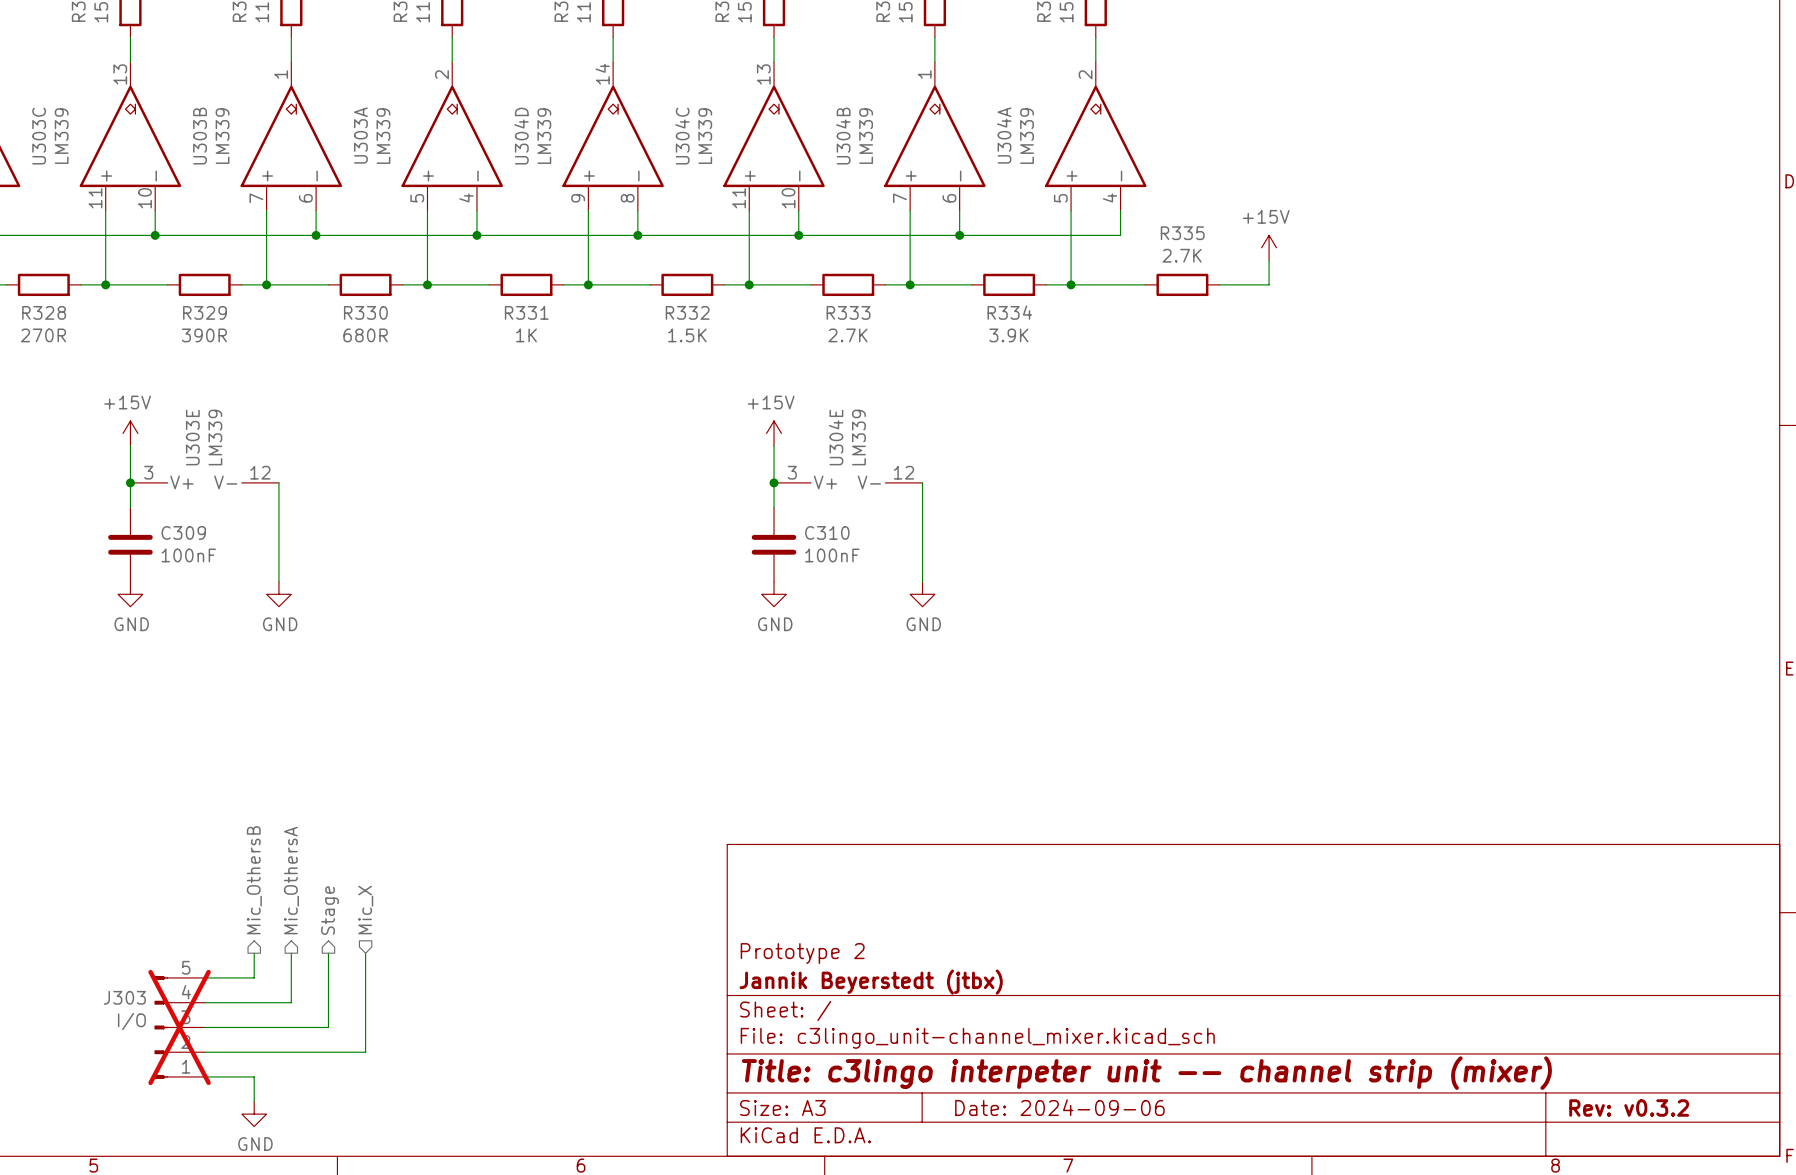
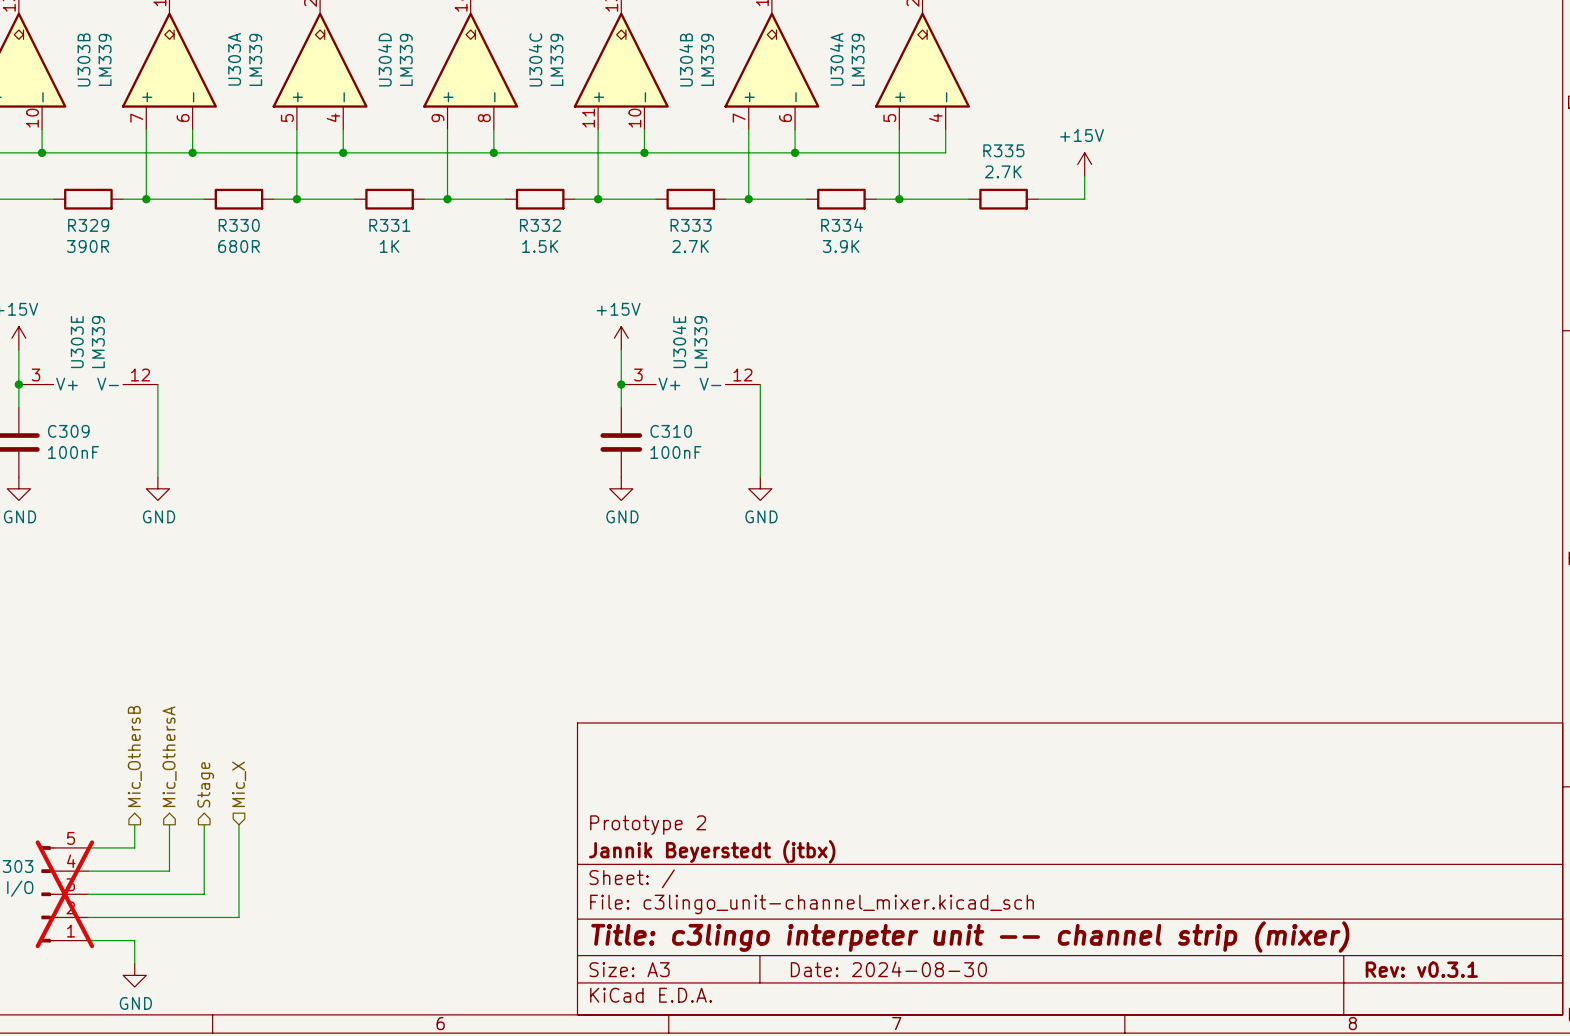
title block: Date: 2024-09-06 (1059, 1107) -> Date: 2024-08-30 (888, 969)
title block: Rev: v0.3.2 (1629, 1108) -> Rev: v0.3.1 (1421, 969)

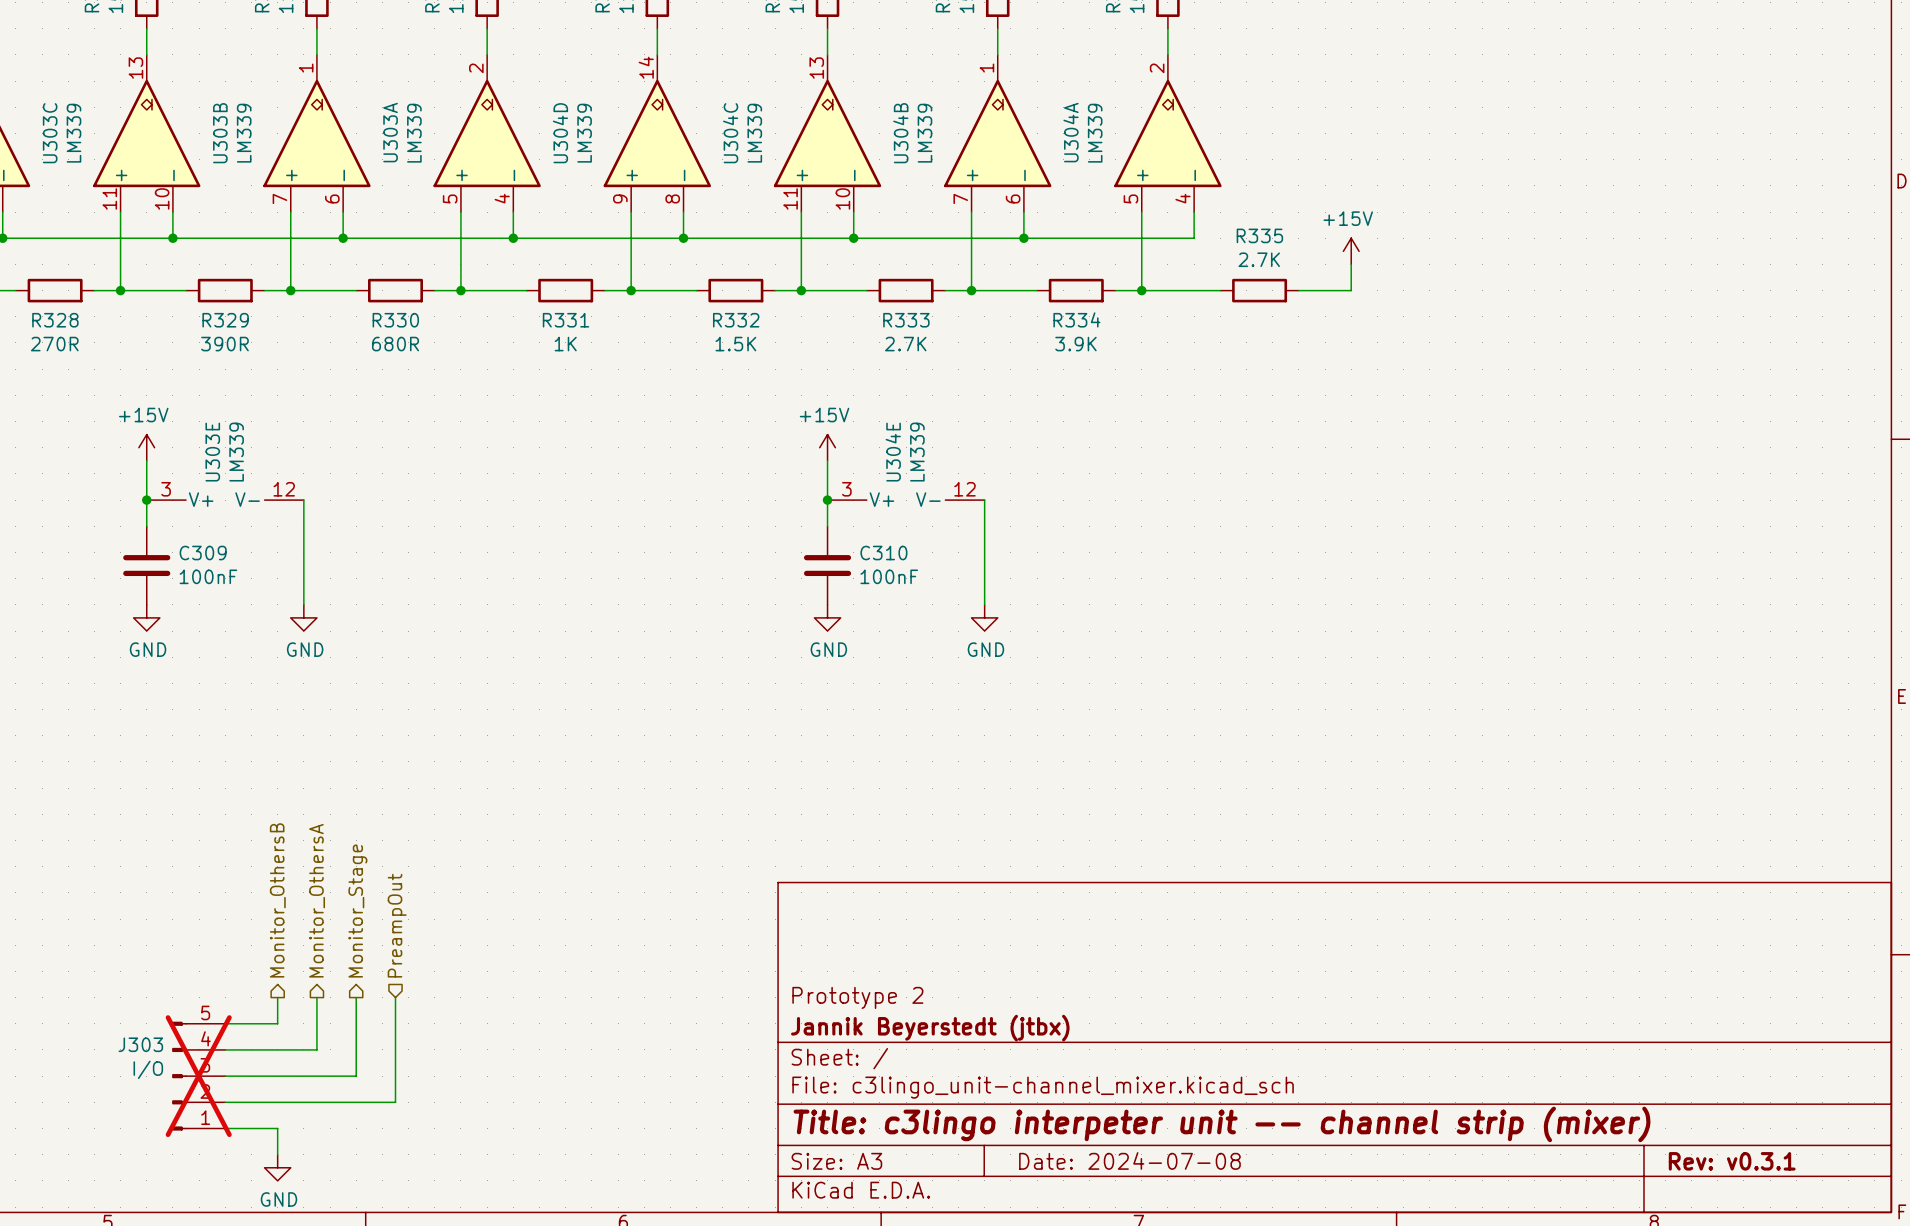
hierarchical label: Mic_OthersB (134, 756) -> Monitor_OthersB (277, 900)
hierarchical label: Mic_OthersA (169, 756) -> Monitor_OthersA (317, 900)
hierarchical label: Stage (205, 784) -> Monitor_Stage (357, 911)
hierarchical label: Mic_X (239, 784) -> PreampOut (397, 925)
title block: Date: 2024-08-30 (888, 969) -> Date: 2024-07-08 (1129, 1160)

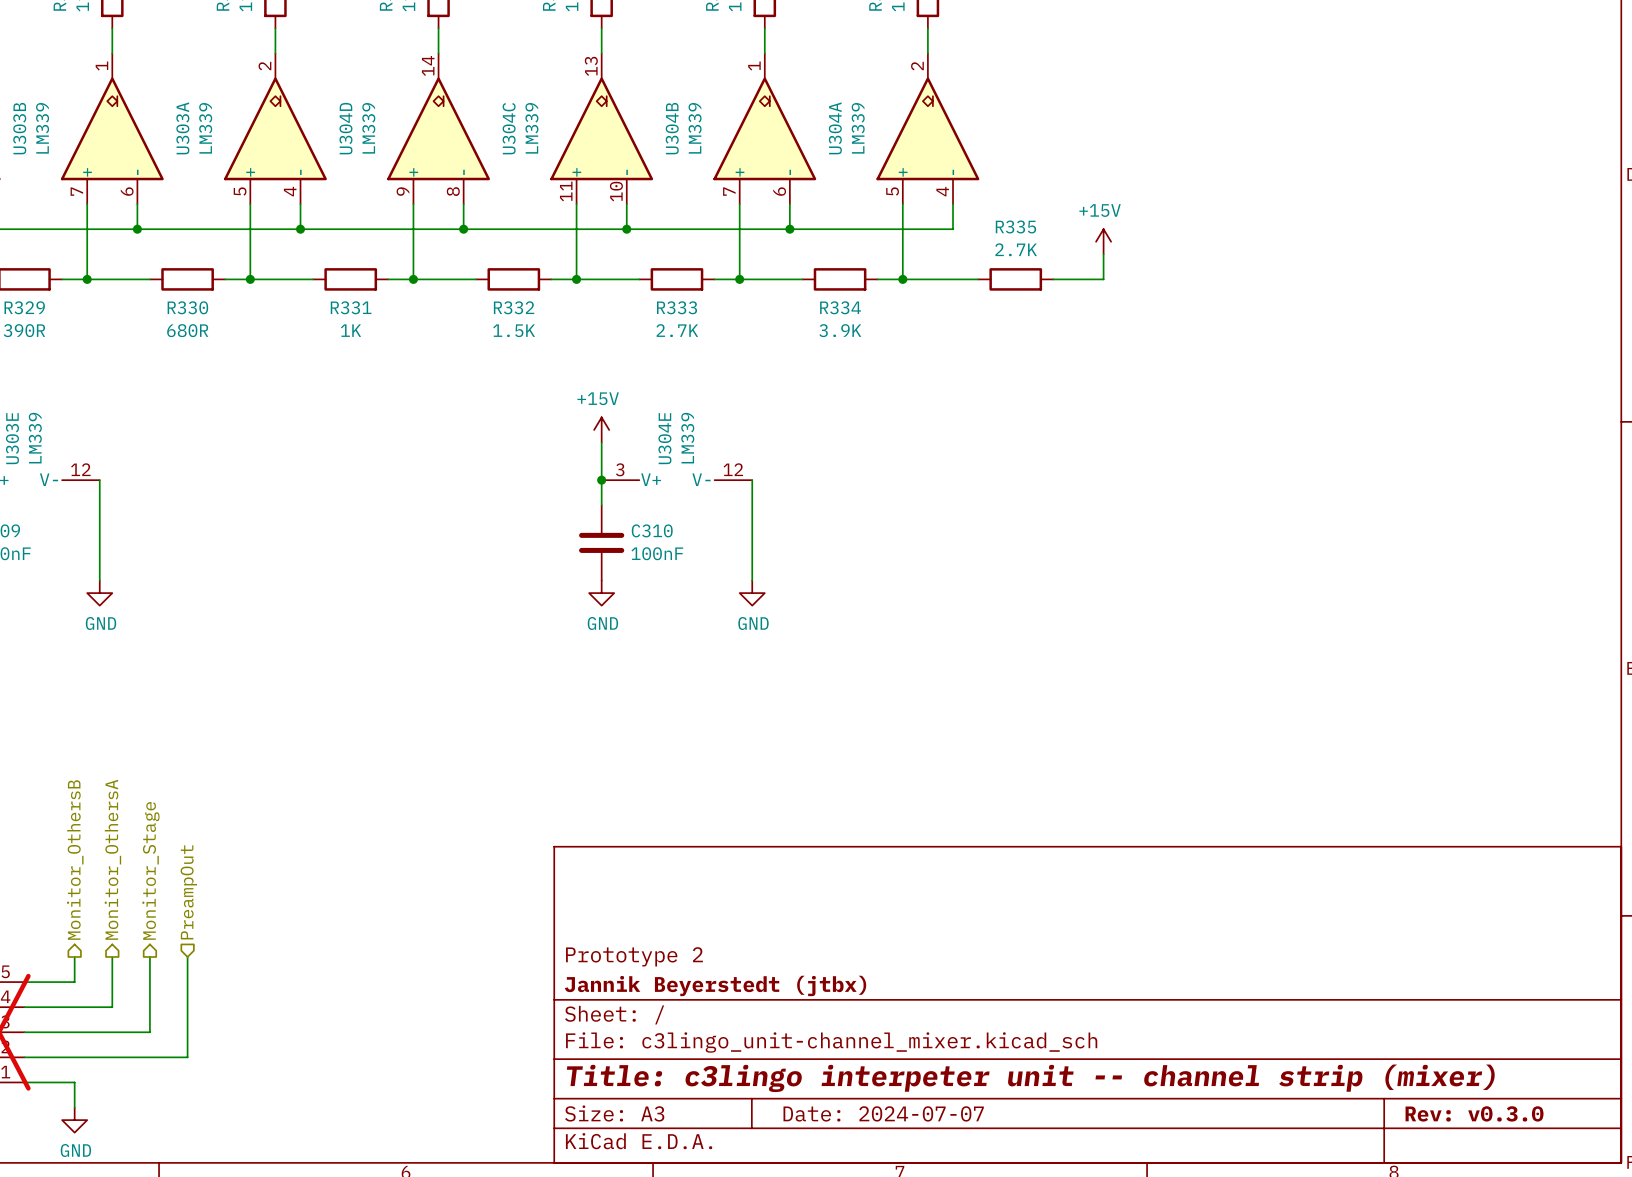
title block: Date: 2024-07-08 (1129, 1160) -> Date: 2024-07-07 (883, 1113)
title block: Rev: v0.3.1 (1732, 1161) -> Rev: v0.3.0 (1474, 1113)

